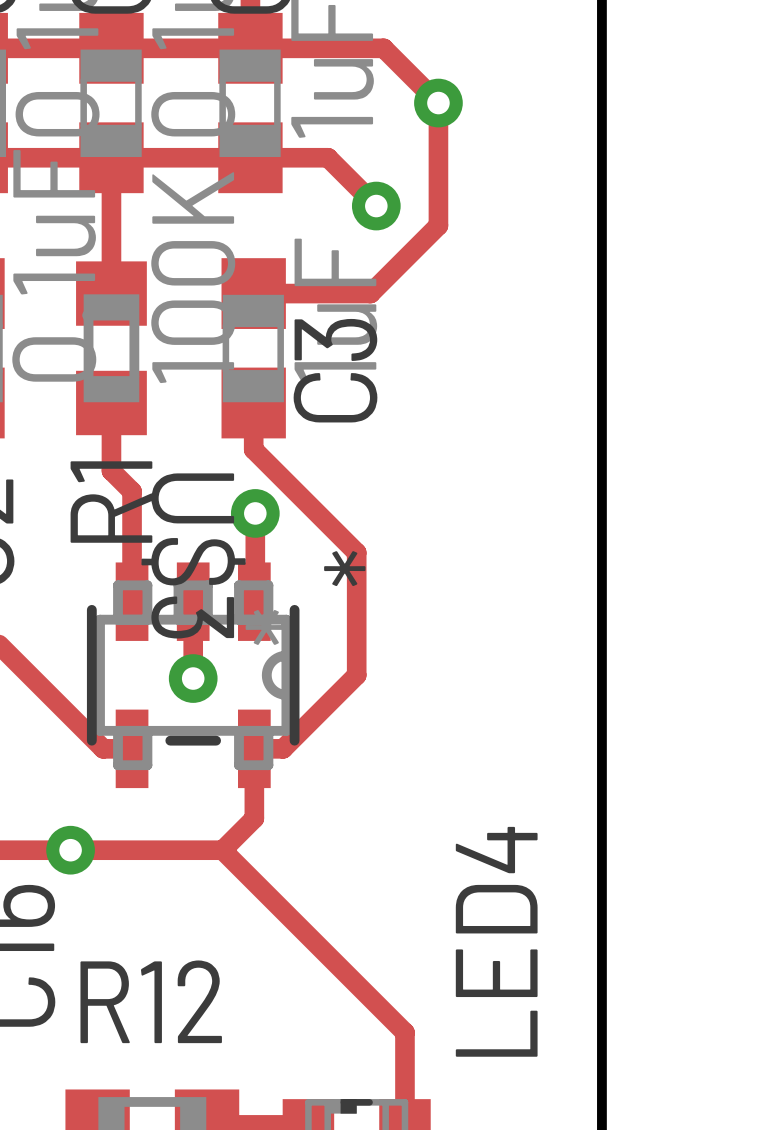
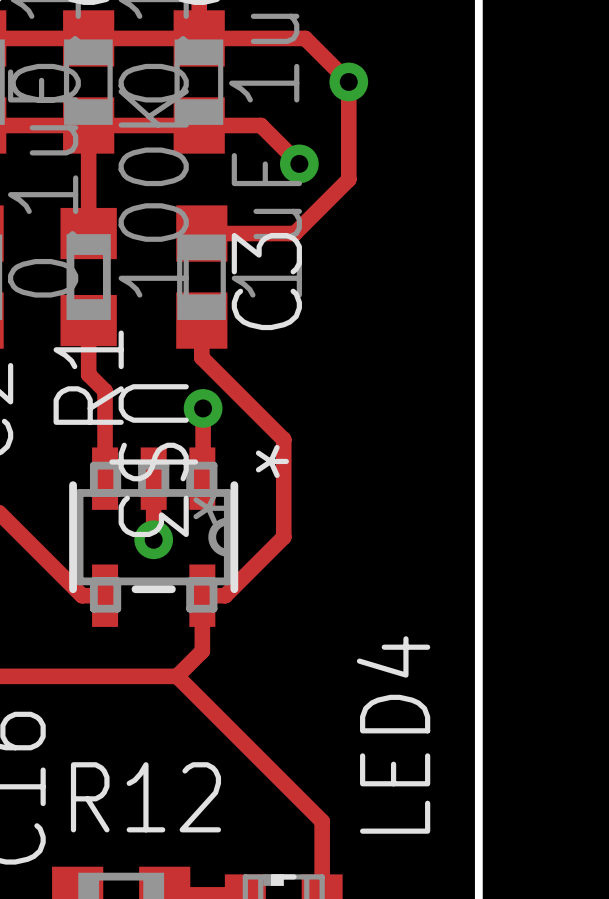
via: (70, 850) -> none

